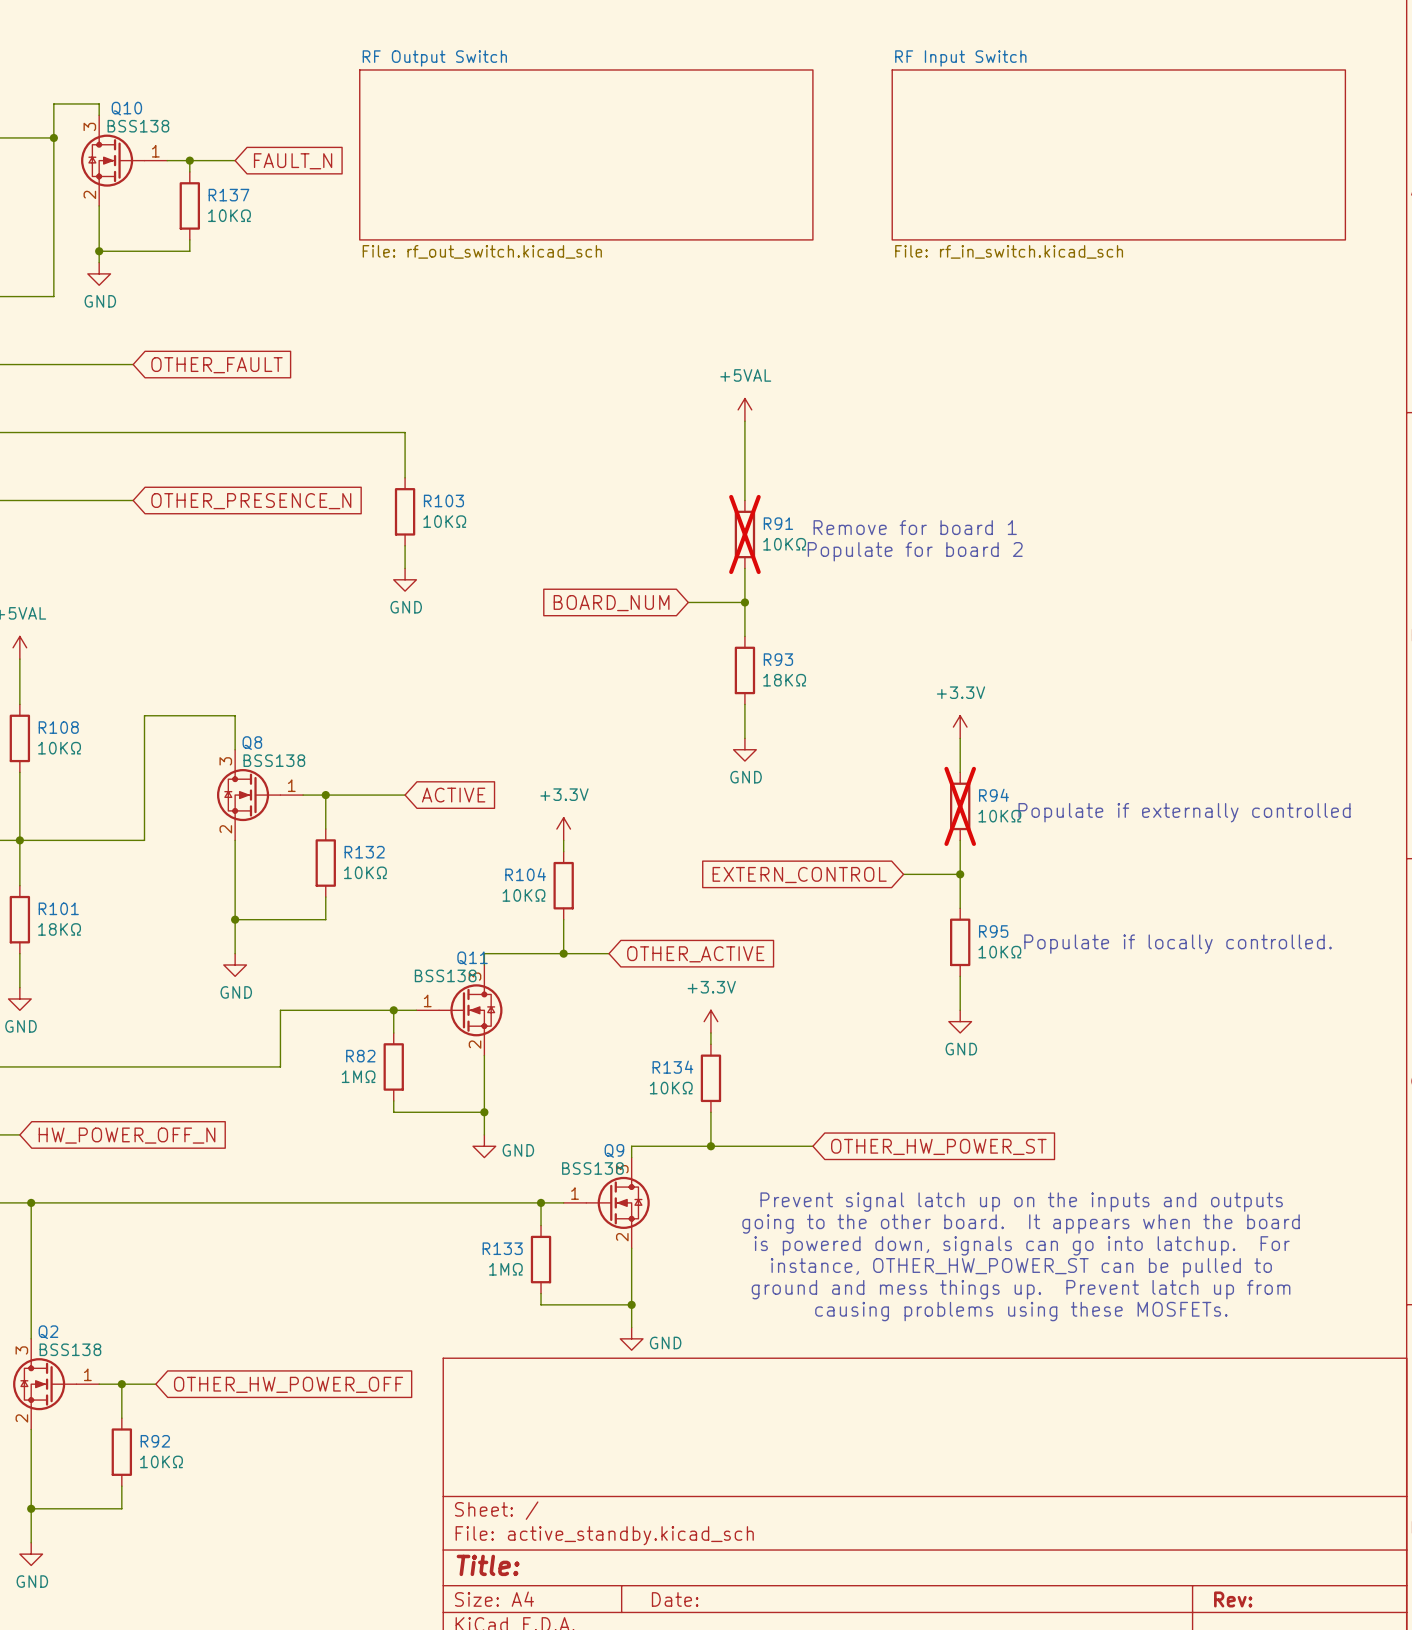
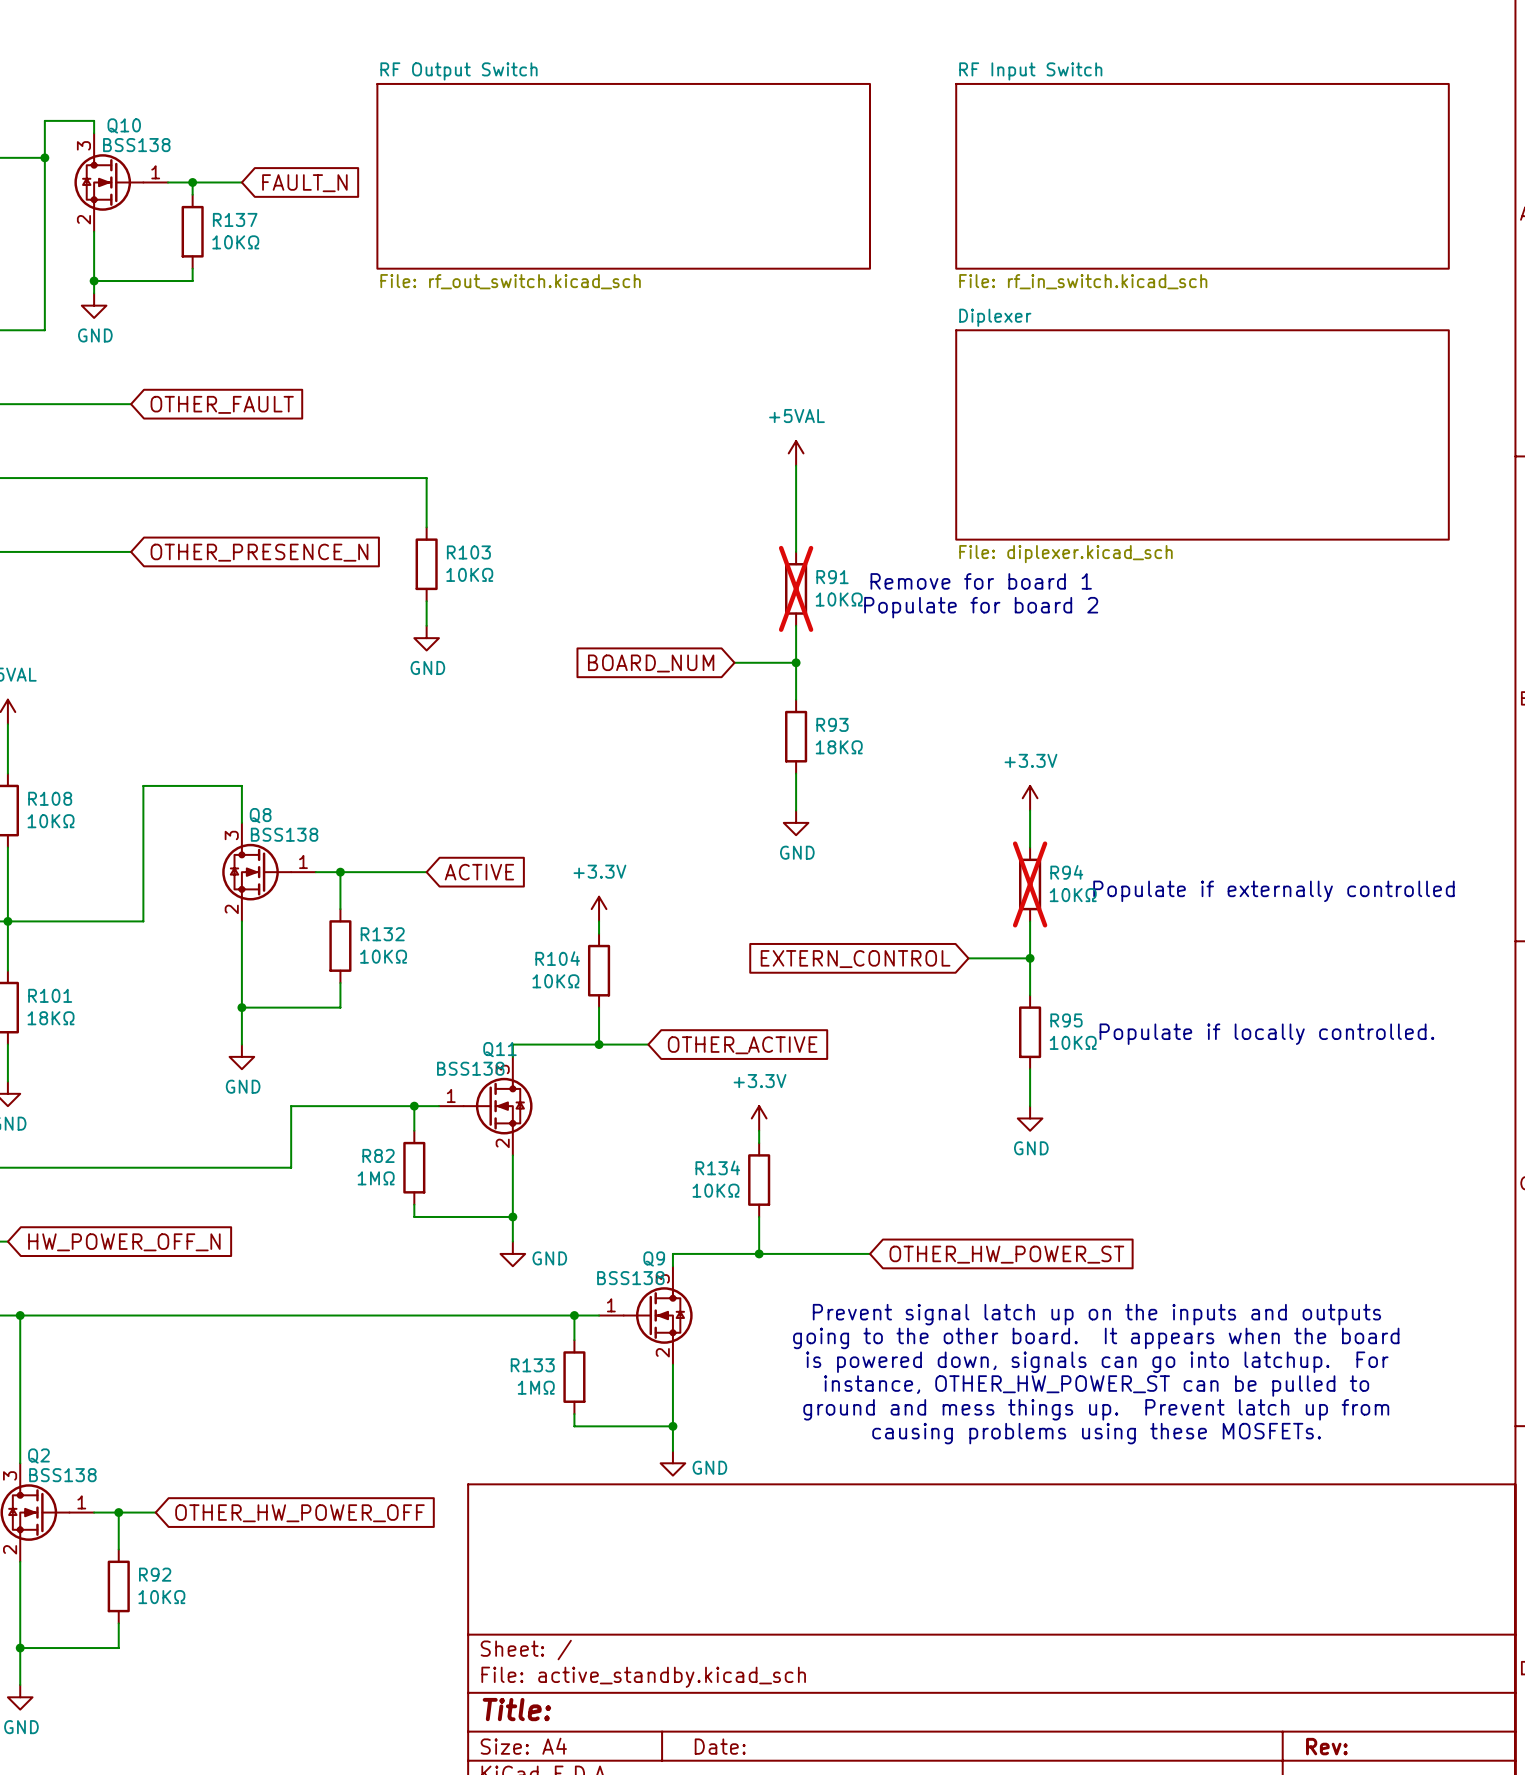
sheet Diplexer: none -> File: diplexer.kicad_sch (1202, 434)

